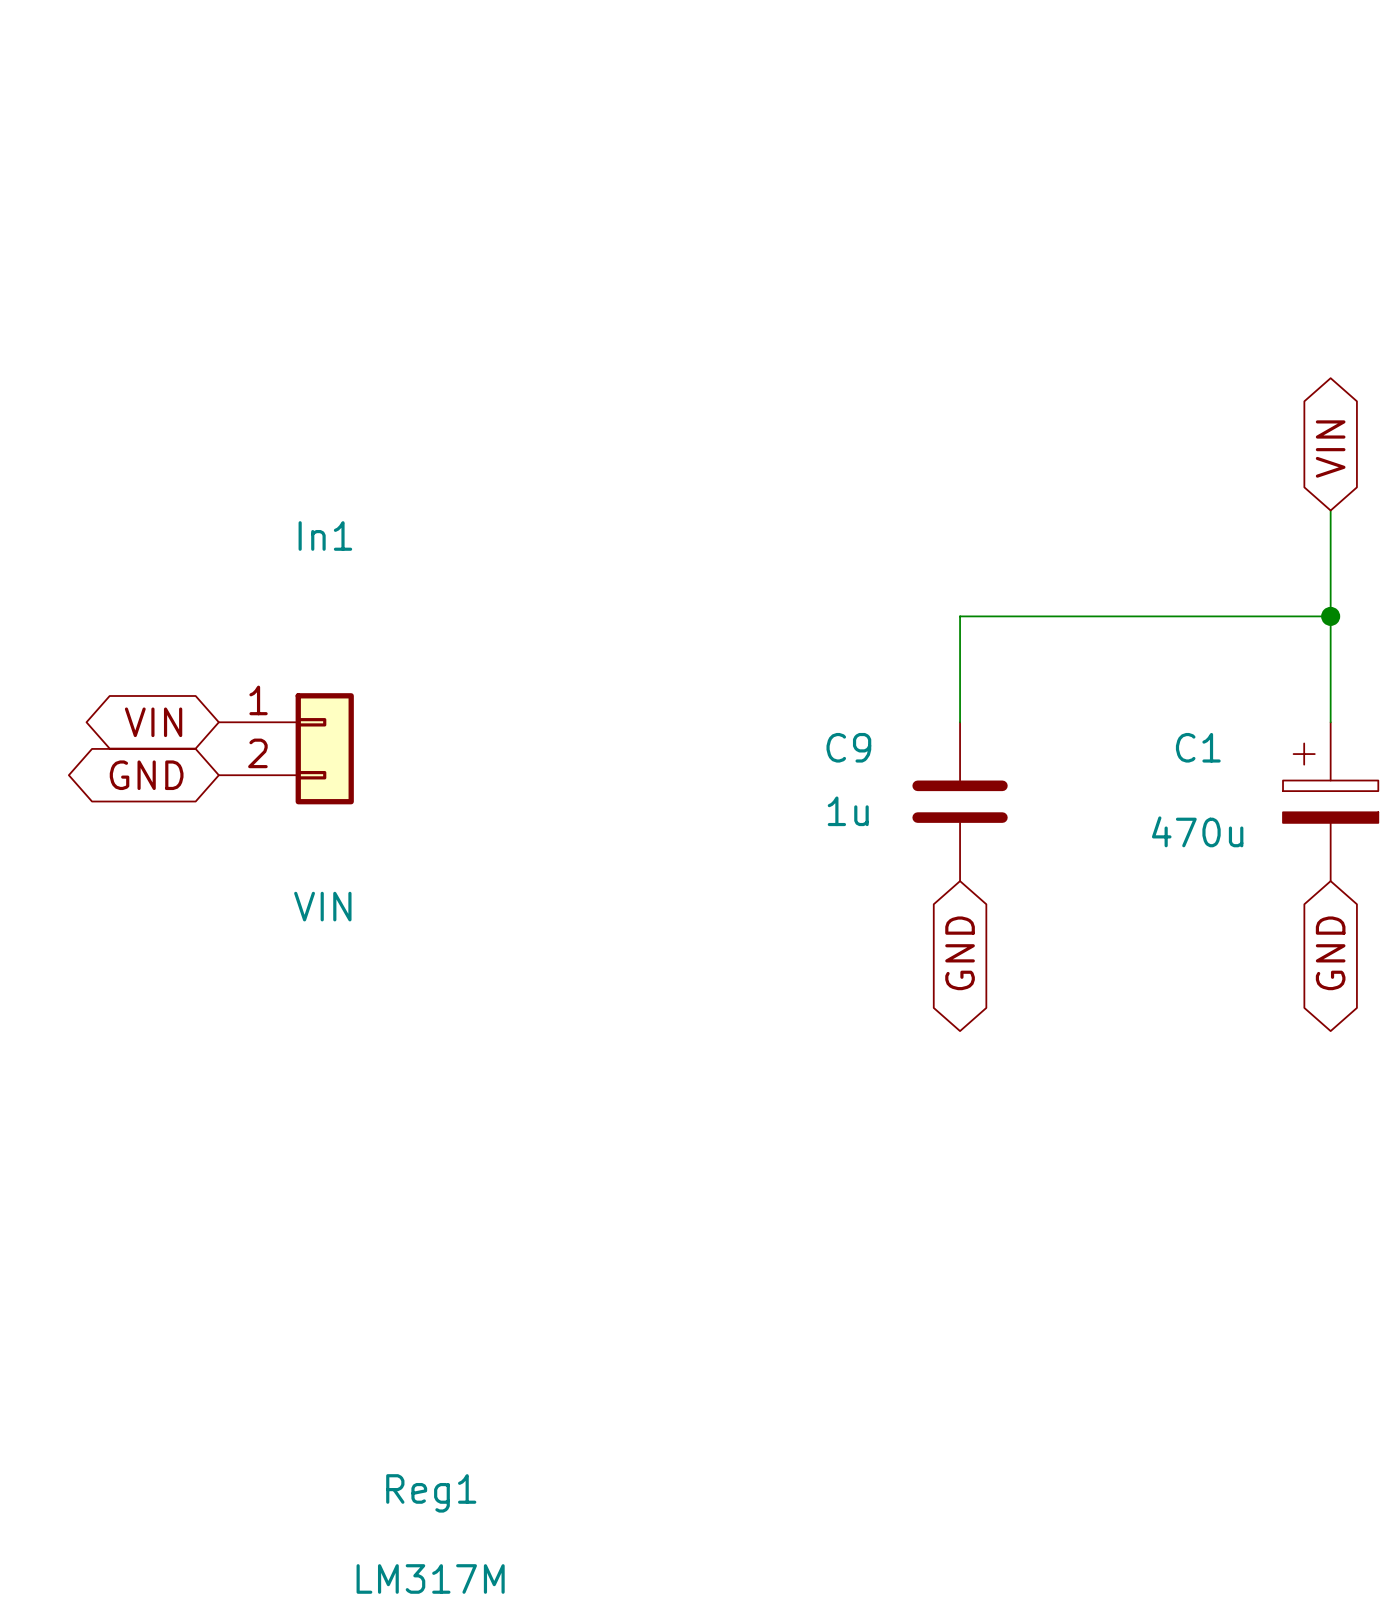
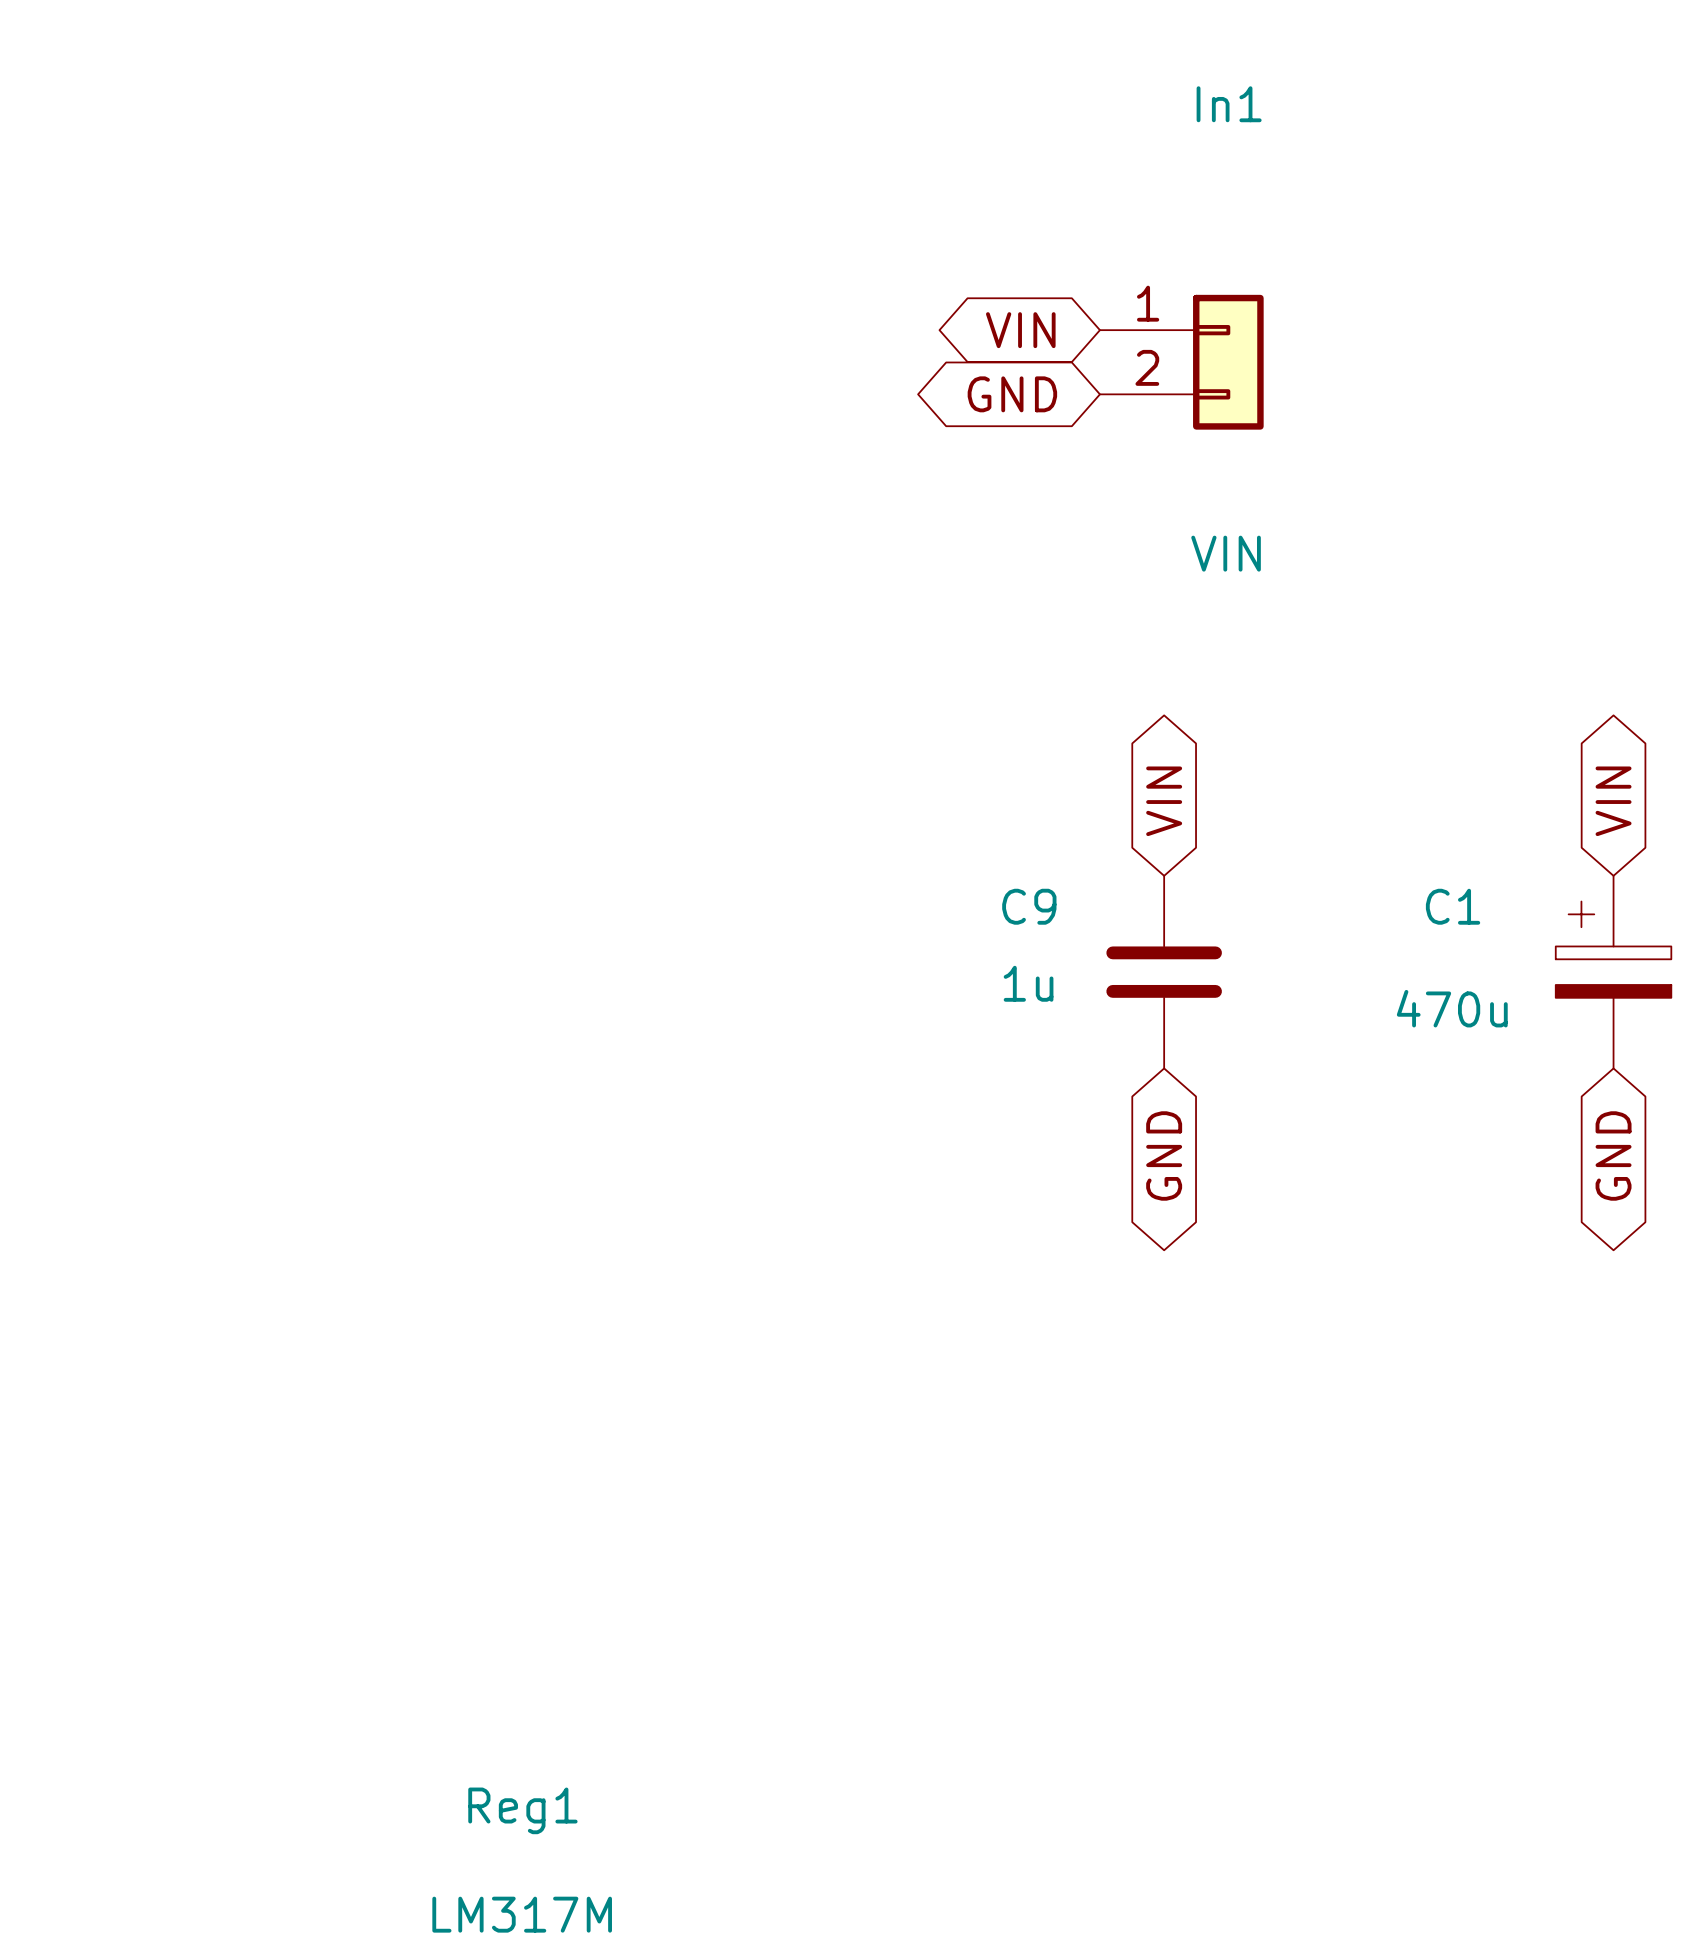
global label: none -> VIN (1020, 330)
global label: none -> GND (1012, 394)
global label position: VIN (1330, 449) -> VIN (1613, 801)
wire: (1330, 510) (1330, 722) -> none
wire: (1330, 616) (960, 616) (960, 722) -> none
junction: (1330, 616) -> none
global label: none -> VIN (1164, 801)
global label: VIN (153, 722) -> none
In1 position: (286, 748) -> (1181, 362)
global label: GND (146, 775) -> none

